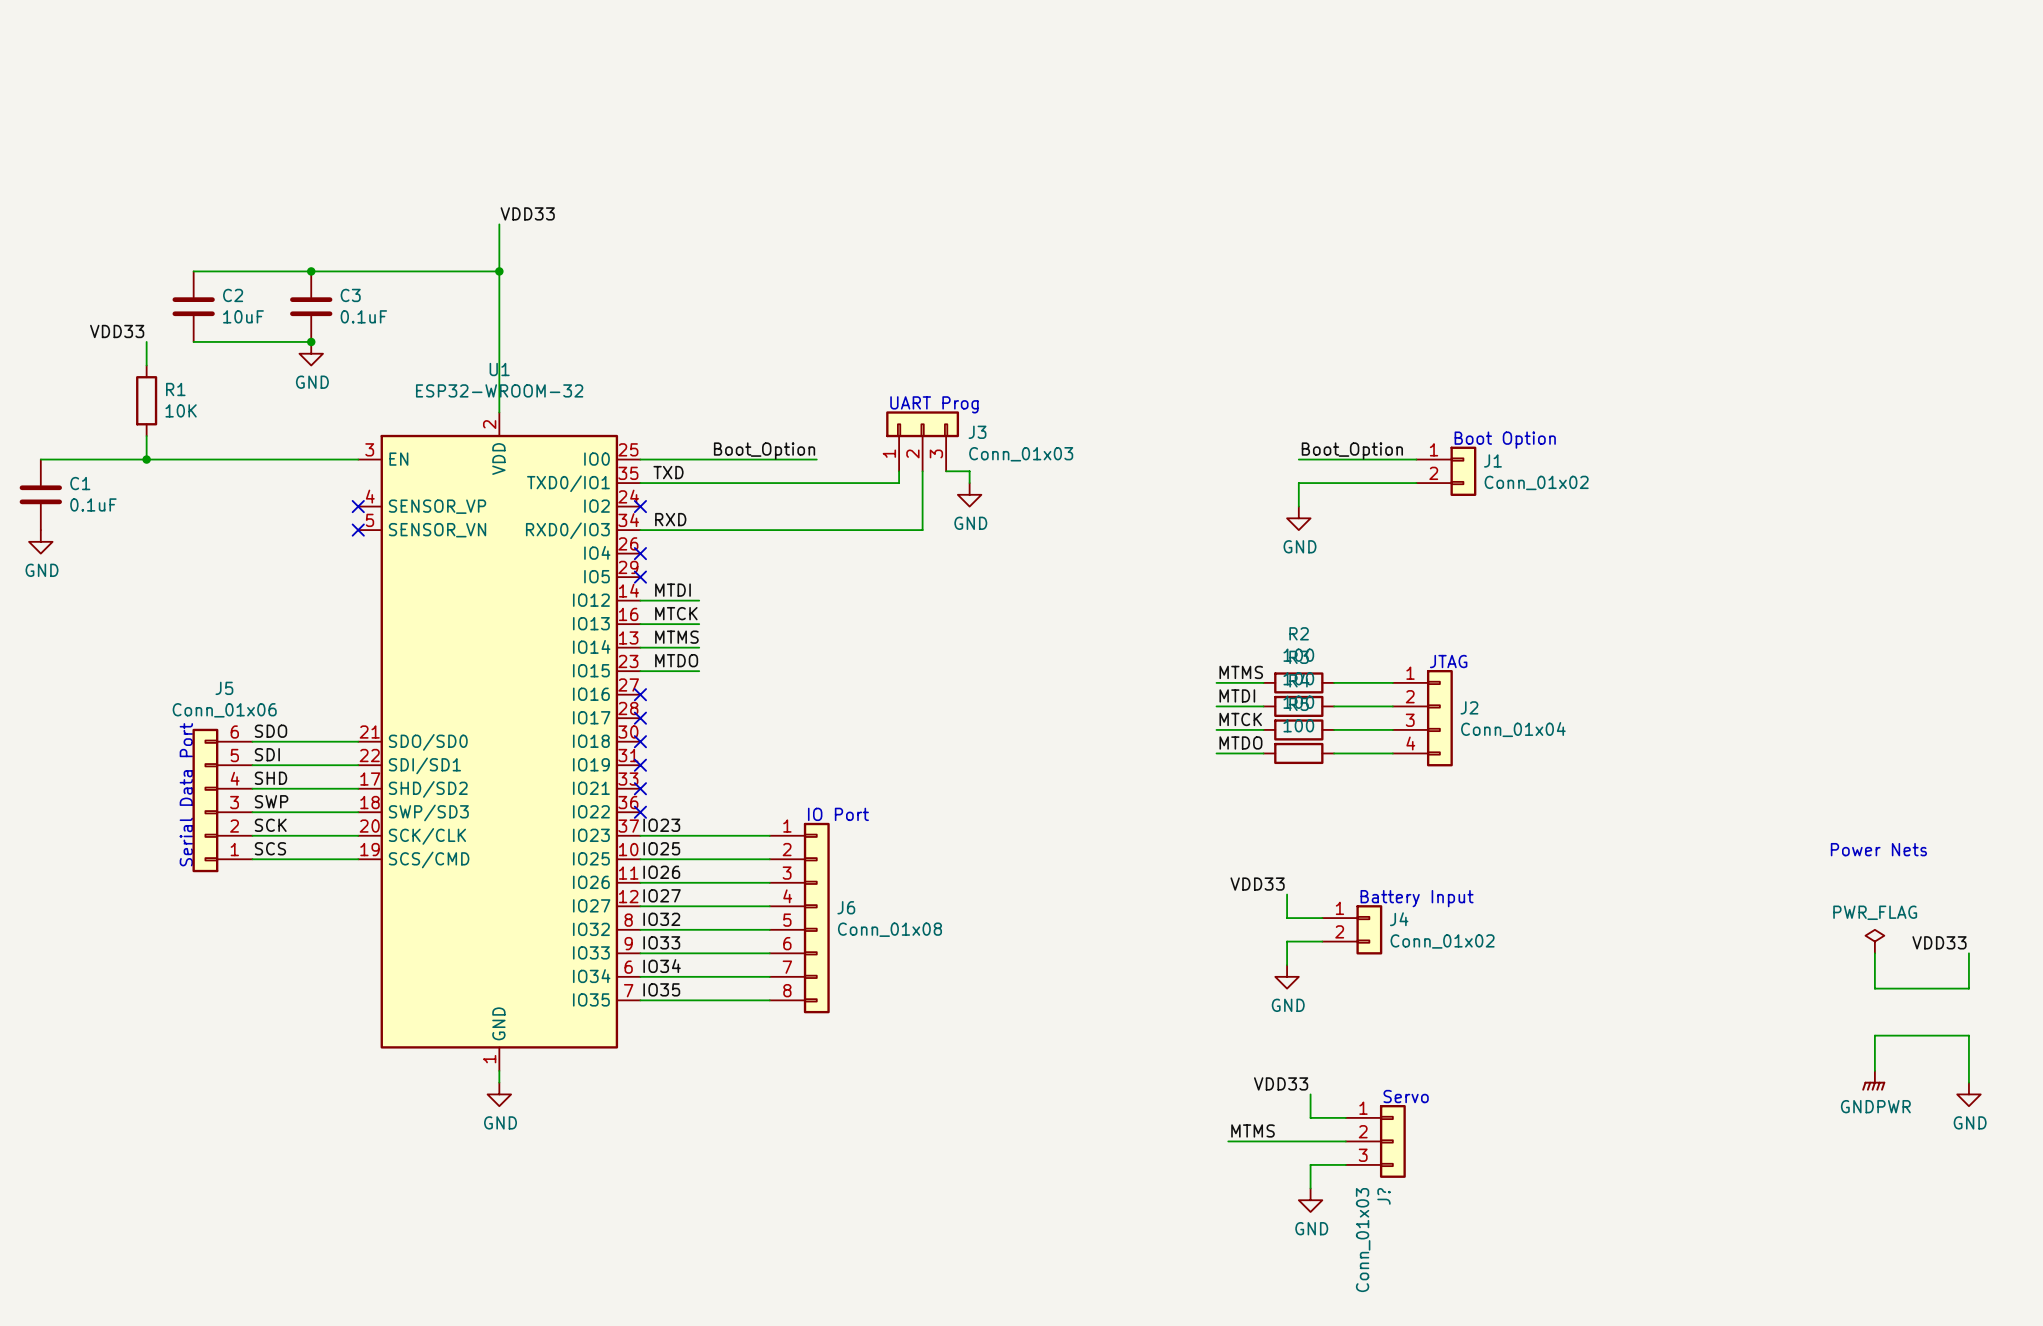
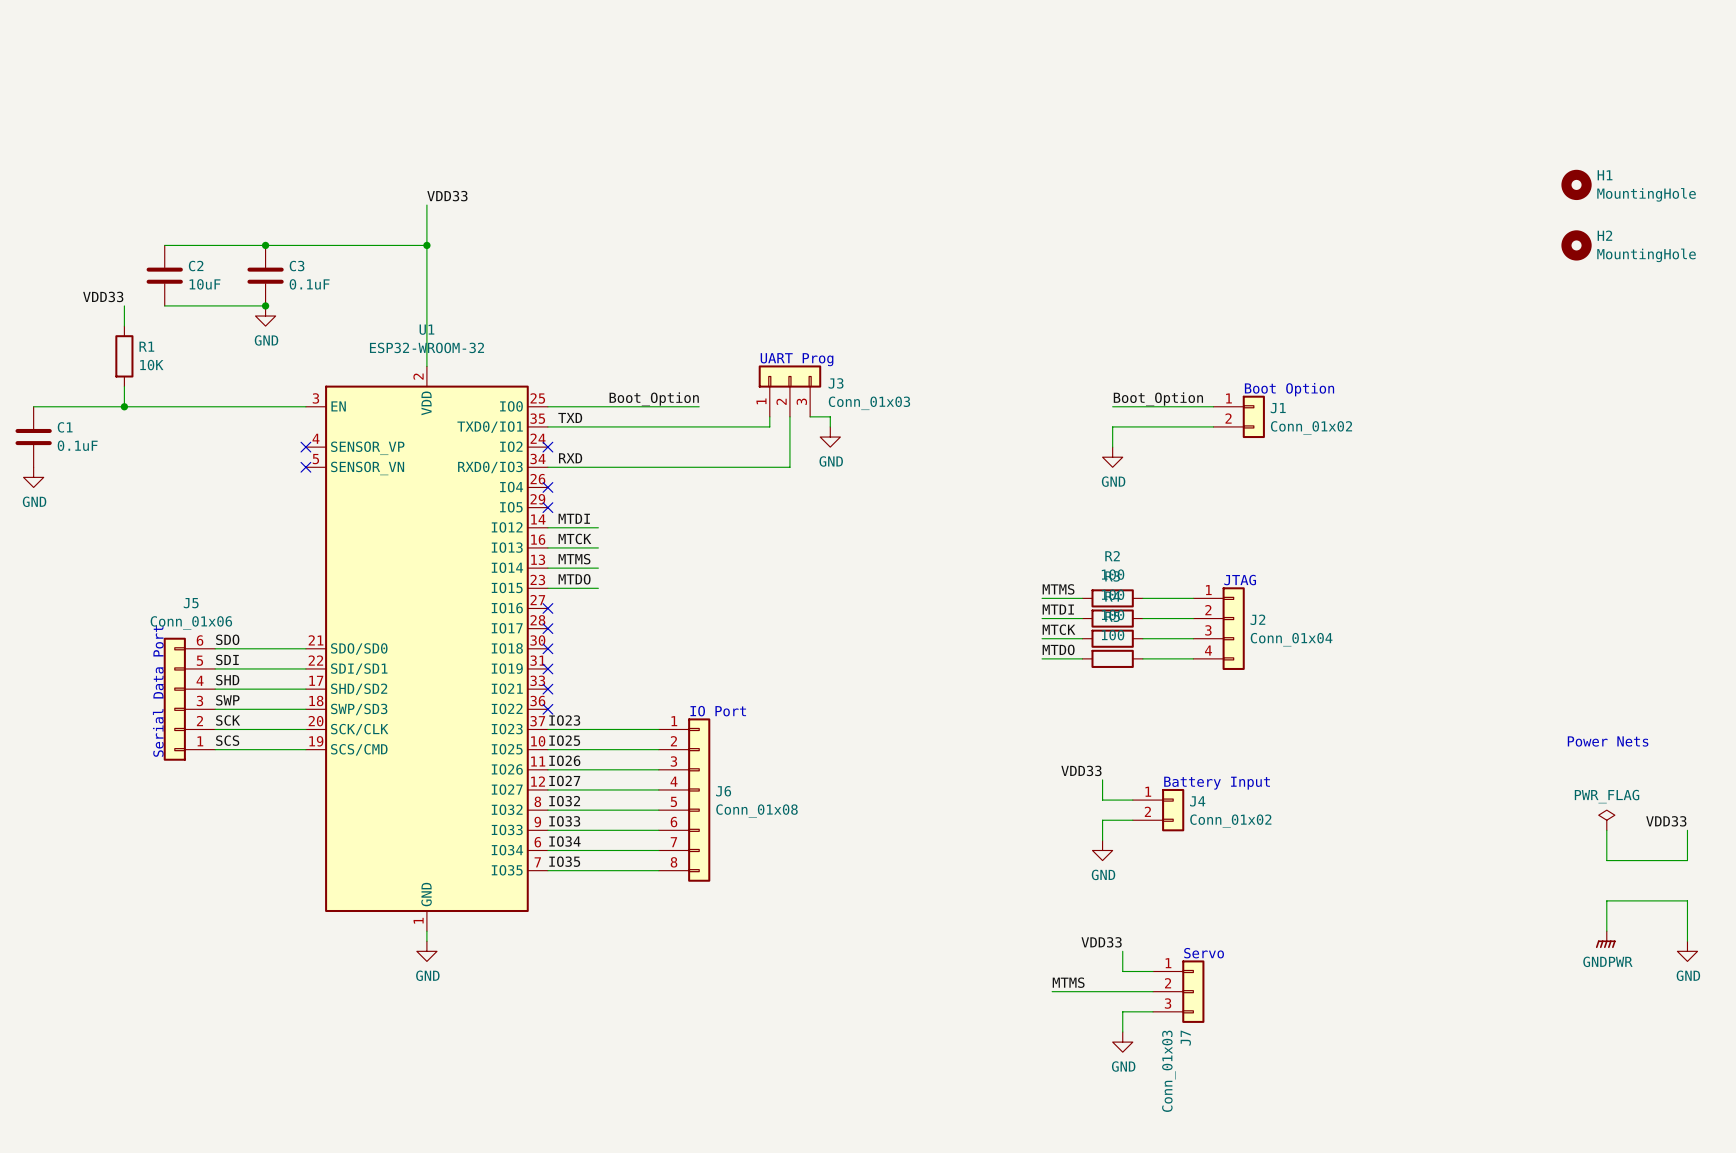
H1: none -> MountingHole (1576, 184)
H2: none -> MountingHole (1576, 245)
J? name: J? (1383, 1196) -> J7 (1185, 1038)

